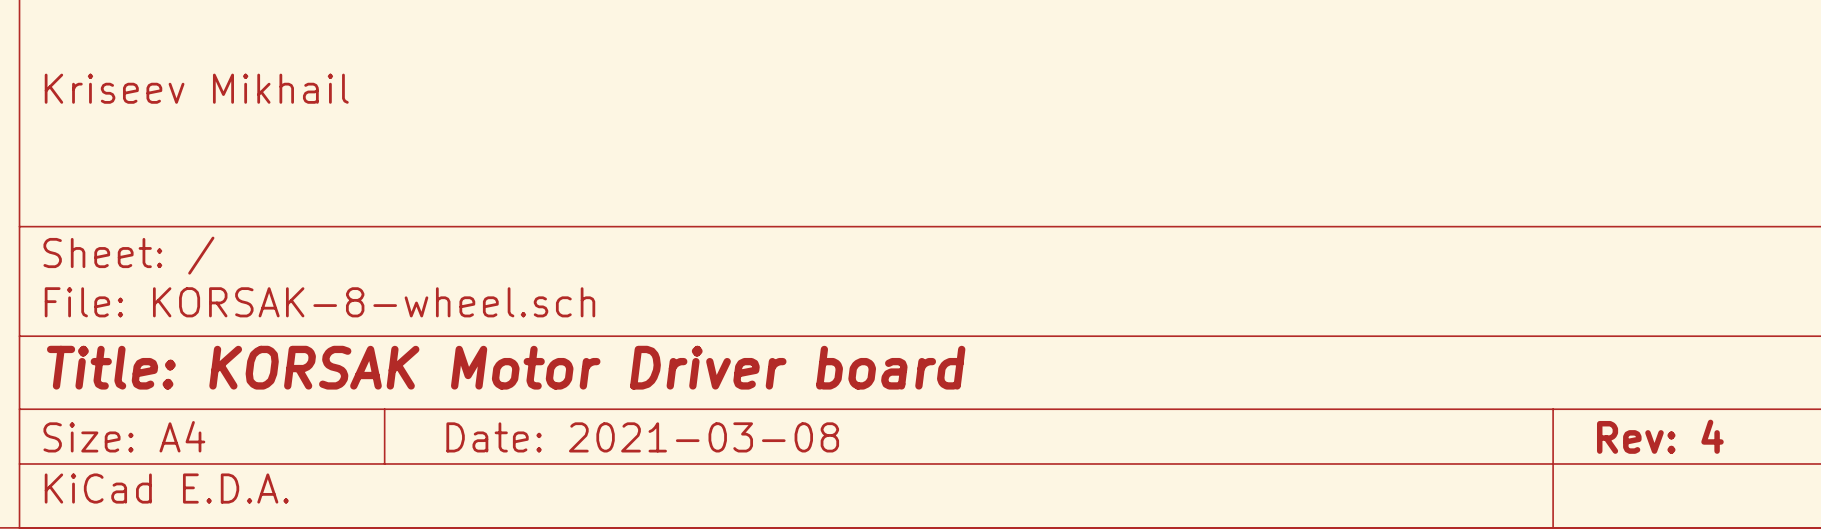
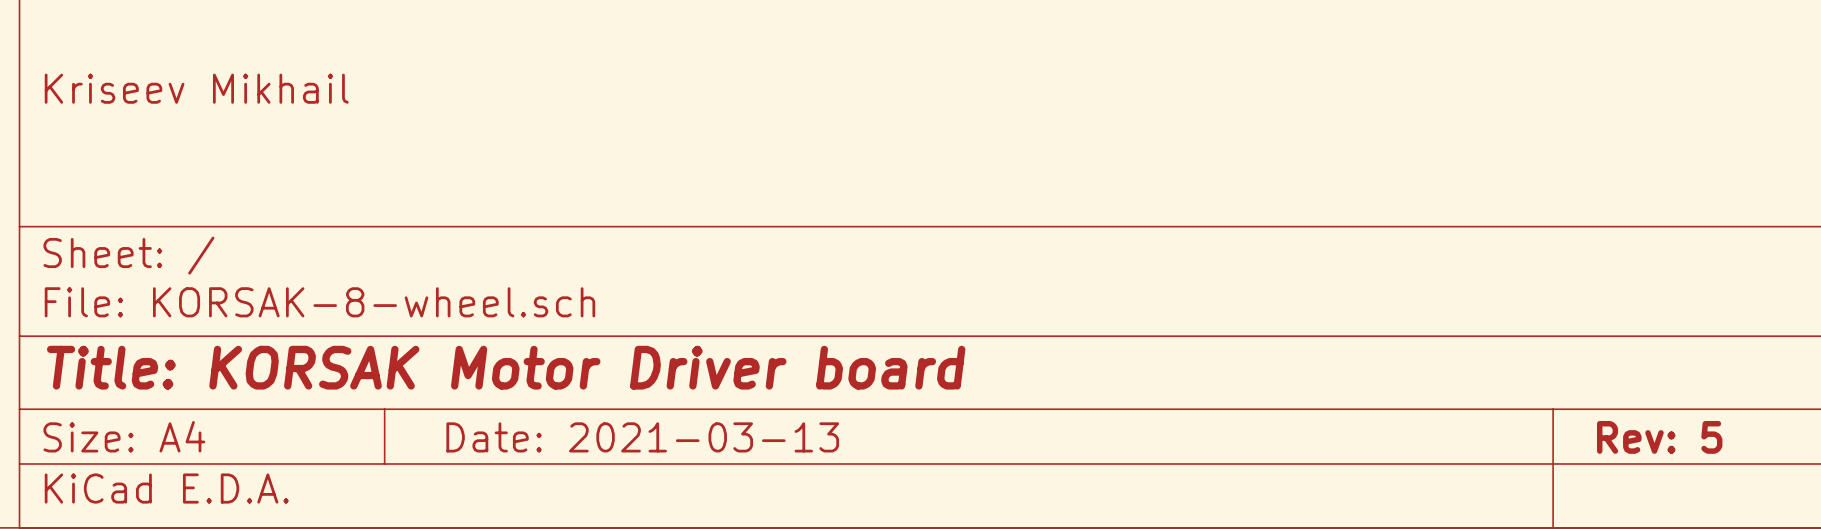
title block: Rev: 4 (1660, 436) -> Rev: 5 (1659, 437)
title block: Date: 2021-03-08 (642, 437) -> Date: 2021-03-13 (642, 437)

